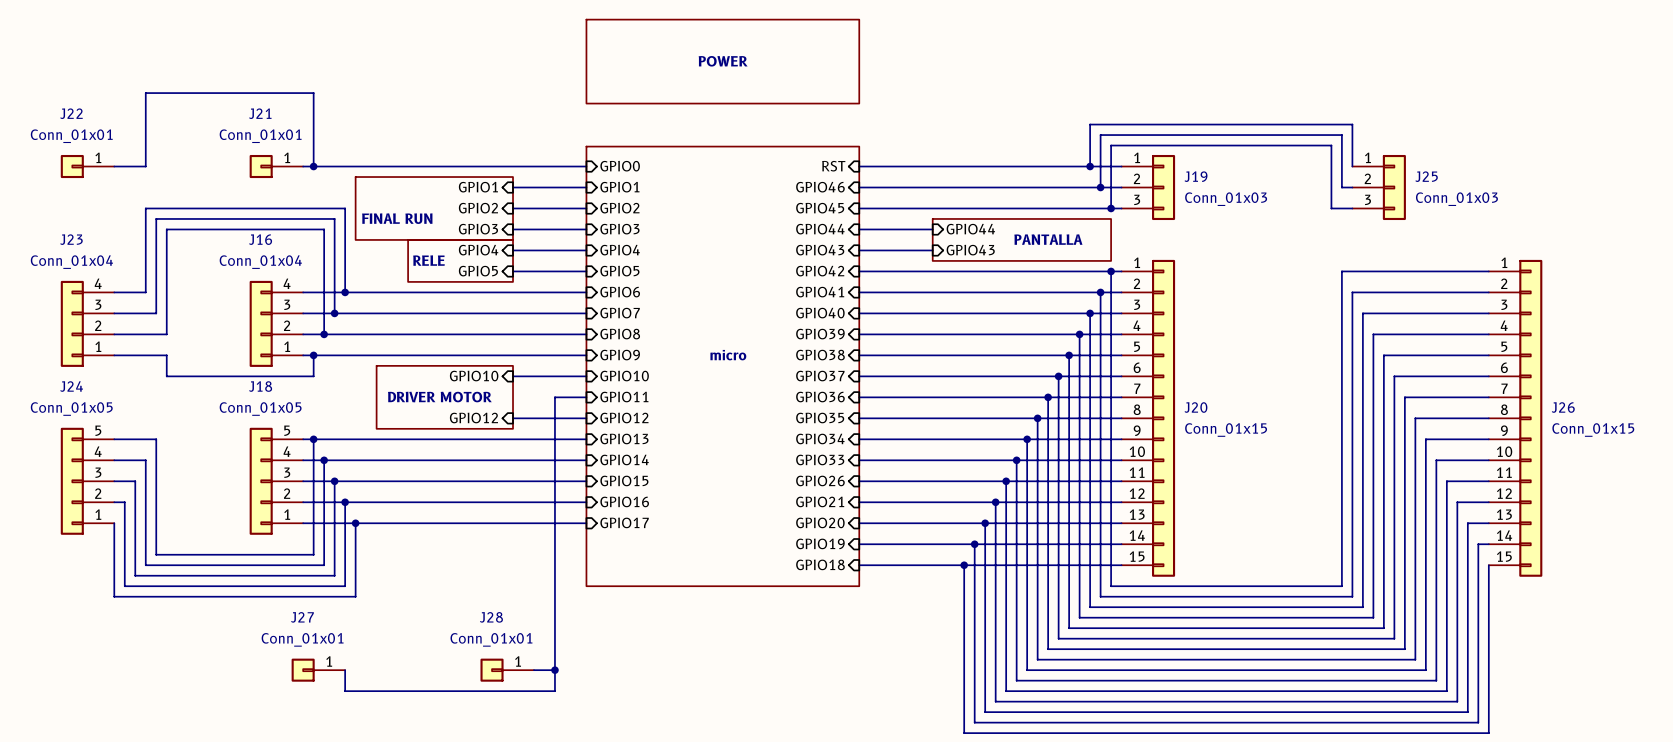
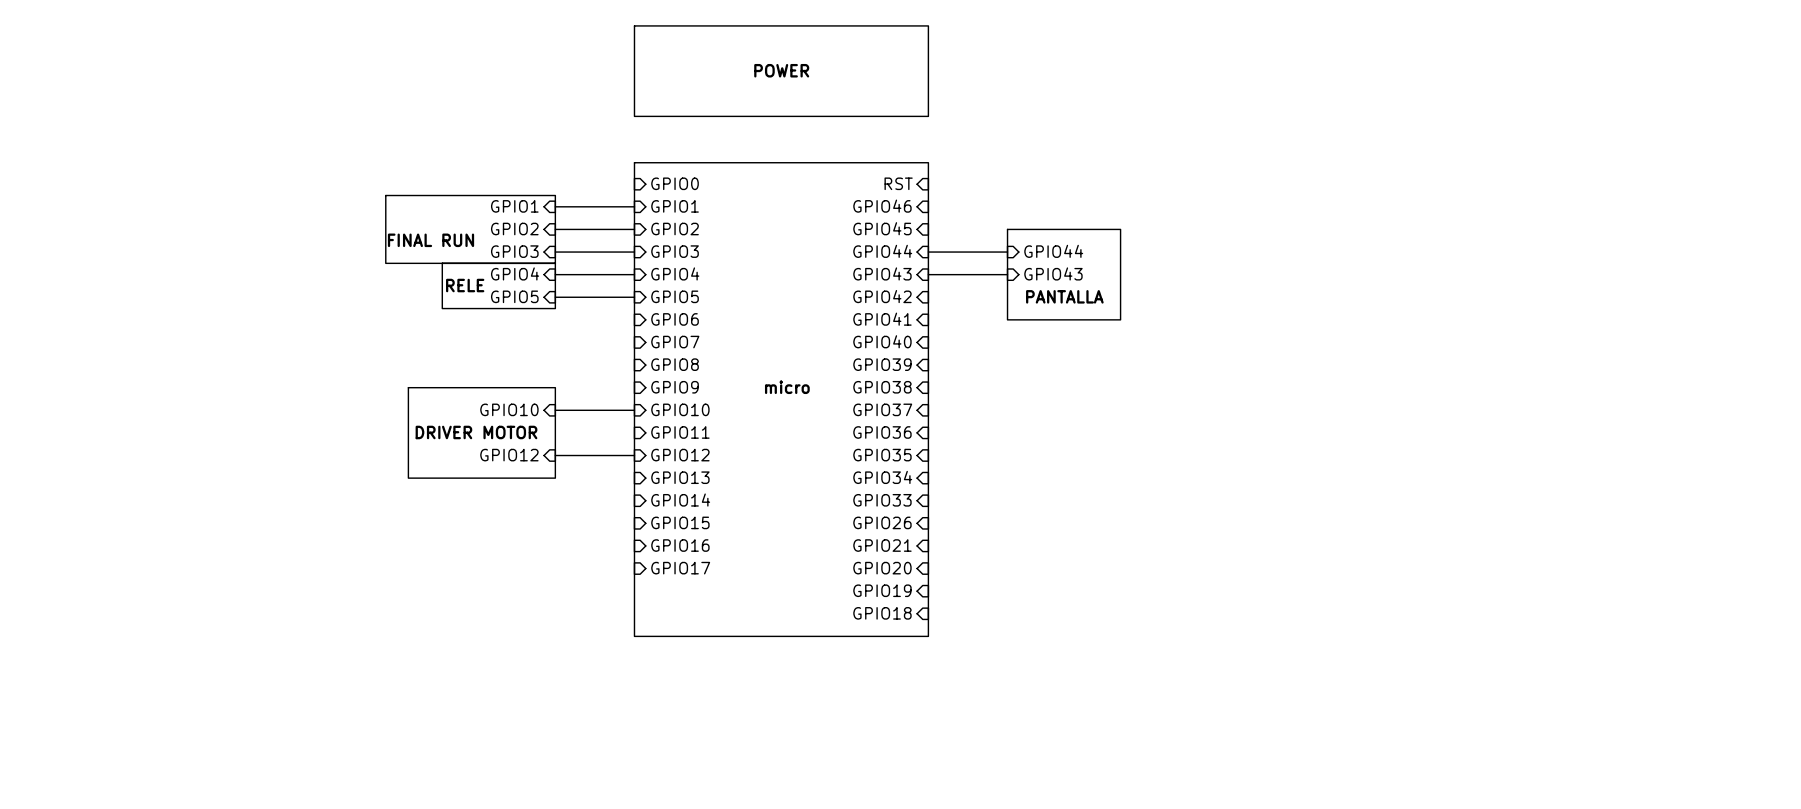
J22: Conn_01x01 (87, 166) -> none
wire: (114, 166) (145, 166) (145, 93) (313, 93) (313, 166) -> none
J21: Conn_01x01 (276, 166) -> none
wire: (303, 166) (586, 166) -> none
junction: (313, 166) -> none
wire: (859, 166) (1121, 166) -> none
wire: (1090, 166) (1090, 124) (1352, 124) (1352, 166) -> none
junction: (1090, 166) -> none
wire: (859, 187) (1121, 187) -> none
wire: (1100, 187) (1100, 135) (1341, 135) (1341, 187) (1352, 187) -> none
junction: (1100, 187) -> none
J19: Conn_01x03 (1148, 187) -> none
J25: Conn_01x03 (1379, 187) -> none
wire: (859, 208) (1121, 208) -> none
wire: (1111, 208) (1111, 145) (1331, 145) (1331, 208) (1352, 208) -> none
junction: (1111, 208) -> none
sheet PANTALLA: (1021, 239) -> none
sheet PANTALLA: none -> (1064, 274)
wire: (859, 271) (1121, 271) -> none
wire: (1111, 271) (1111, 586) (1341, 586) (1341, 271) (1488, 271) -> none
junction: (1111, 271) -> none
wire: (114, 292) (145, 292) (145, 208) (345, 208) (345, 292) -> none
wire: (303, 292) (586, 292) -> none
junction: (345, 292) -> none
wire: (859, 292) (1121, 292) -> none
wire: (1100, 292) (1100, 596) (1352, 596) (1352, 292) (1488, 292) -> none
junction: (1100, 292) -> none
wire: (114, 313) (156, 313) (156, 218) (334, 218) (334, 313) -> none
wire: (303, 313) (586, 313) -> none
junction: (334, 313) -> none
wire: (859, 313) (1121, 313) -> none
wire: (1090, 313) (1090, 607) (1362, 607) (1362, 313) (1488, 313) -> none
junction: (1090, 313) -> none
J23: Conn_01x04 (87, 323) -> none
J16: Conn_01x04 (276, 323) -> none
wire: (114, 334) (166, 334) (166, 229) (324, 229) (324, 334) -> none
wire: (303, 334) (586, 334) -> none
junction: (324, 334) -> none
wire: (859, 334) (1121, 334) -> none
wire: (1079, 334) (1079, 617) (1373, 617) (1373, 334) (1488, 334) -> none
junction: (1079, 334) -> none
wire: (114, 355) (166, 355) (166, 376) (313, 376) (313, 355) -> none
wire: (303, 355) (586, 355) -> none
junction: (313, 355) -> none
wire: (859, 355) (1121, 355) -> none
wire: (1069, 355) (1069, 628) (1383, 628) (1383, 355) (1488, 355) -> none
junction: (1069, 355) -> none
sheet DRIVER MOTOR shape: [375, 365, 514, 430] -> [407, 387, 557, 479]
wire: (859, 376) (1121, 376) -> none
wire: (1058, 376) (1058, 638) (1394, 638) (1394, 376) (1488, 376) -> none
junction: (1058, 376) -> none
wire: (586, 397) (554, 397) (554, 691) (345, 691) (345, 670) -> none
wire: (859, 397) (1121, 397) -> none
wire: (1048, 397) (1048, 649) (1404, 649) (1404, 397) (1488, 397) -> none
junction: (1048, 397) -> none
wire: (859, 418) (1121, 418) -> none
wire: (1037, 418) (1037, 659) (1415, 659) (1415, 418) (1488, 418) -> none
junction: (1037, 418) -> none
J20: Conn_01x15 (1148, 418) -> none
J26: Conn_01x15 (1515, 418) -> none
wire: (114, 439) (156, 439) (156, 554) (313, 554) (313, 439) -> none
wire: (303, 439) (586, 439) -> none
junction: (313, 439) -> none
wire: (859, 439) (1121, 439) -> none
wire: (1027, 439) (1027, 670) (1425, 670) (1425, 439) (1488, 439) -> none
junction: (1027, 439) -> none
wire: (114, 460) (145, 460) (145, 565) (324, 565) (324, 460) -> none
wire: (303, 460) (586, 460) -> none
junction: (324, 460) -> none
wire: (859, 460) (1121, 460) -> none
wire: (1016, 460) (1016, 680) (1436, 680) (1436, 460) (1488, 460) -> none
junction: (1016, 460) -> none
J24: Conn_01x05 (87, 481) -> none
wire: (114, 481) (135, 481) (135, 575) (334, 575) (334, 481) -> none
J18: Conn_01x05 (276, 481) -> none
wire: (303, 481) (586, 481) -> none
junction: (334, 481) -> none
wire: (859, 481) (1121, 481) -> none
wire: (1006, 481) (1006, 691) (1446, 691) (1446, 481) (1488, 481) -> none
junction: (1006, 481) -> none
wire: (114, 502) (124, 502) (124, 586) (345, 586) (345, 502) -> none
wire: (303, 502) (586, 502) -> none
junction: (345, 502) -> none
wire: (859, 502) (1121, 502) -> none
wire: (995, 502) (995, 701) (1457, 701) (1457, 502) (1488, 502) -> none
junction: (995, 502) -> none
wire: (114, 523) (114, 596) (355, 596) (355, 523) -> none
wire: (303, 523) (586, 523) -> none
junction: (355, 523) -> none
wire: (859, 523) (1121, 523) -> none
wire: (985, 523) (985, 712) (1467, 712) (1467, 523) (1488, 523) -> none
junction: (985, 523) -> none
wire: (859, 544) (1121, 544) -> none
wire: (974, 544) (974, 722) (1478, 722) (1478, 544) (1488, 544) -> none
junction: (974, 544) -> none
wire: (859, 565) (1121, 565) -> none
wire: (964, 565) (964, 733) (1488, 733) (1488, 565) -> none
junction: (964, 565) -> none
J27: Conn_01x01 (318, 670) -> none
J28: Conn_01x01 (507, 670) -> none
wire: (533, 670) (554, 670) -> none
junction: (554, 670) -> none

